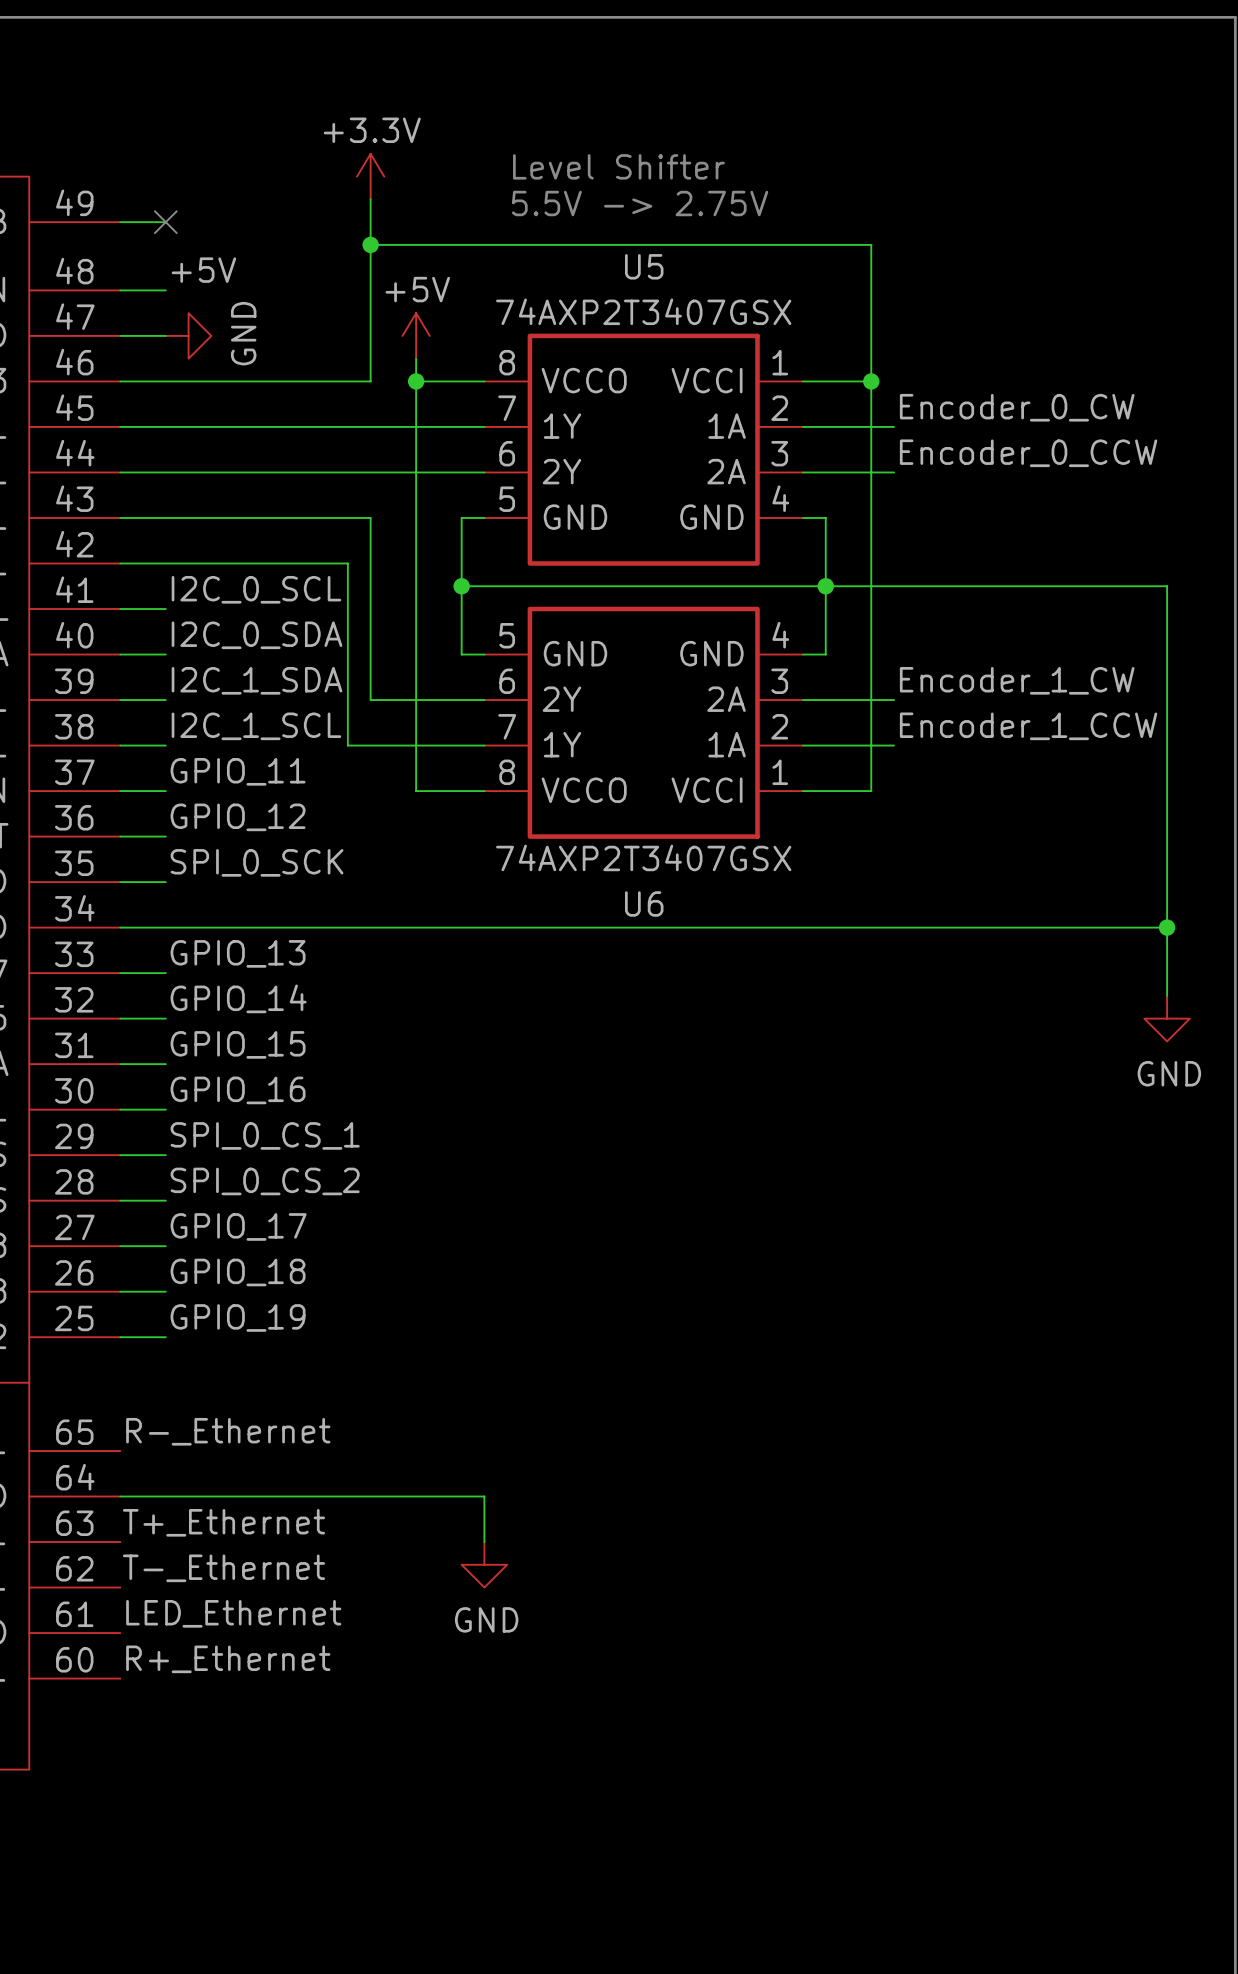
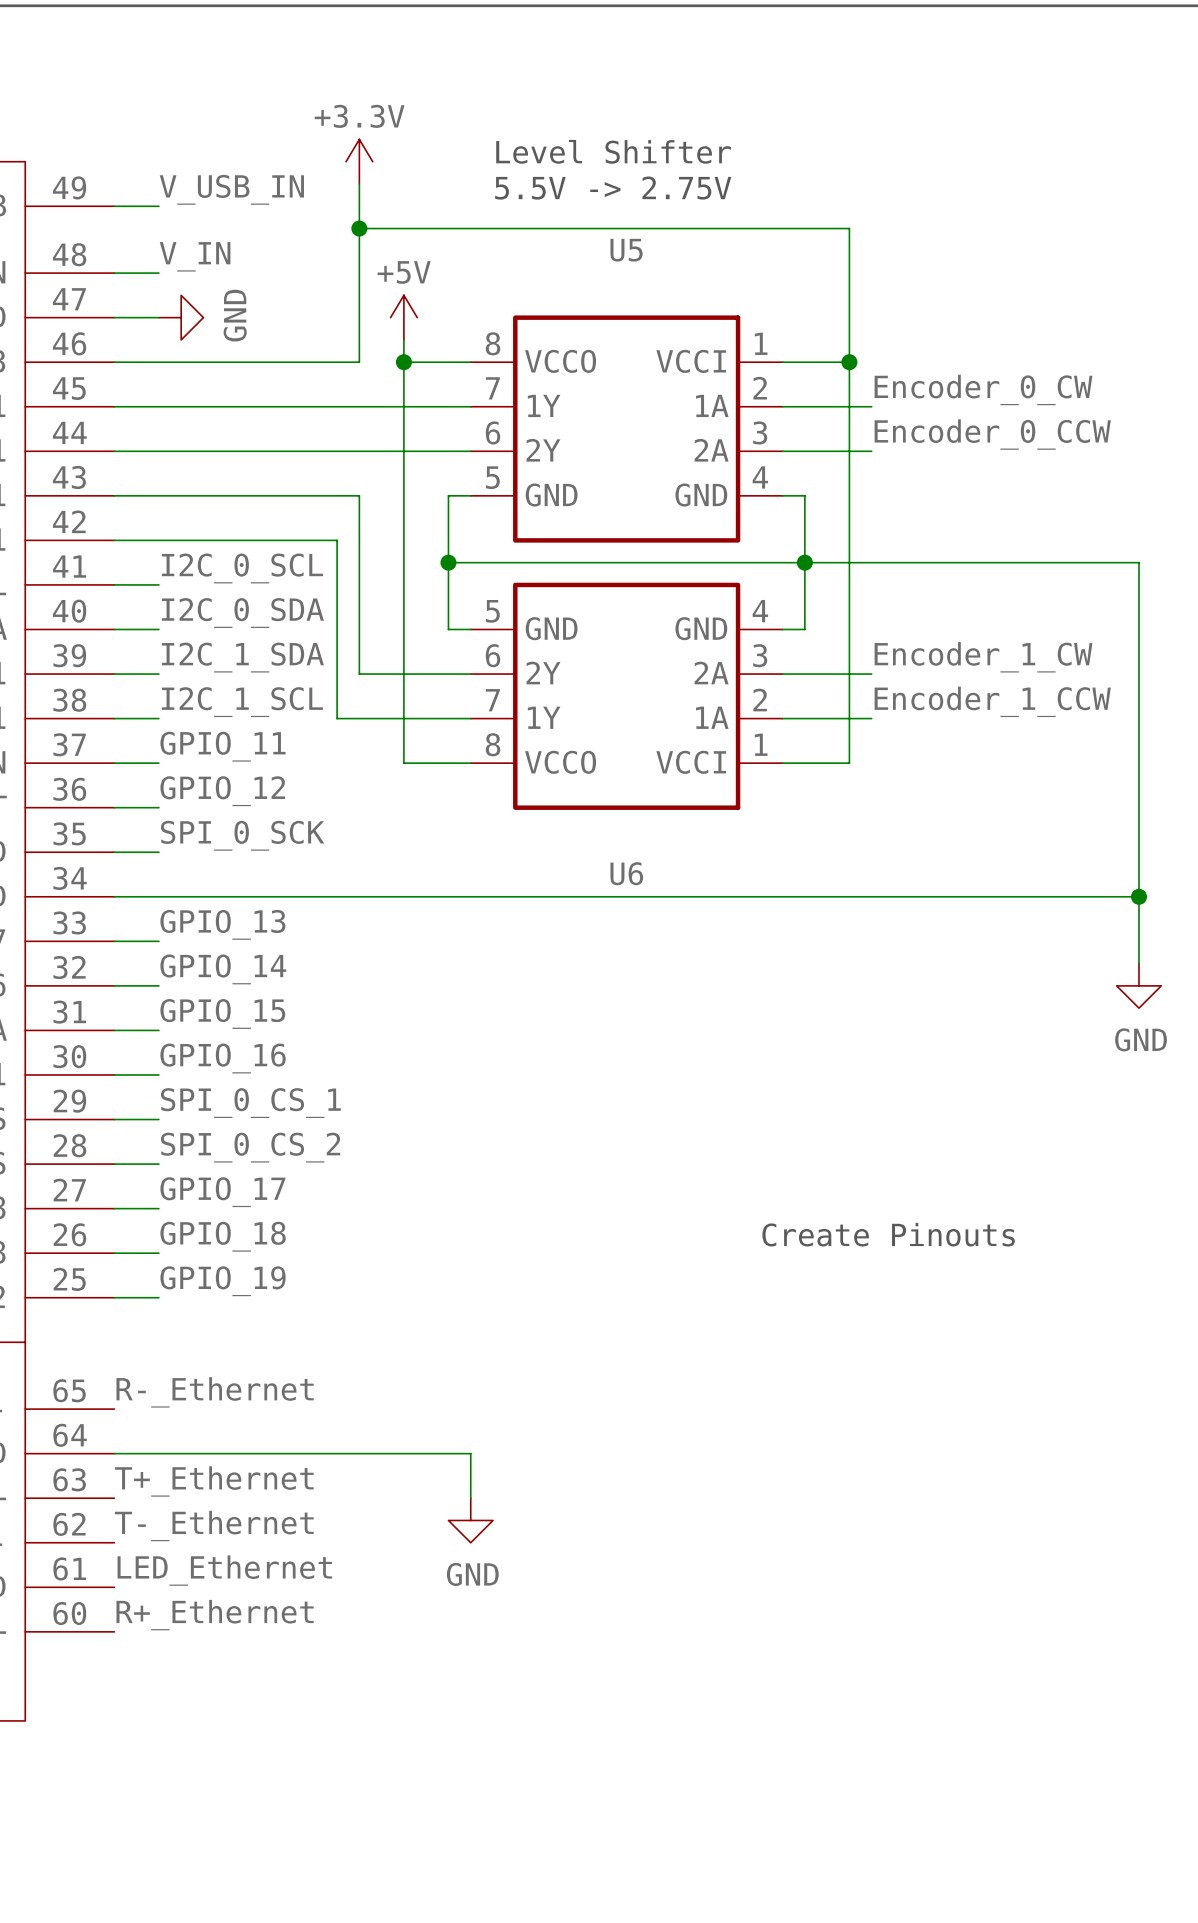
label: none -> V_USB_IN (231, 189)
no-connect mark: (165, 222) -> none
label: +5V (203, 270) -> V_IN (195, 256)
U5 value: 74AXP2T3407GSX (643, 311) -> none
U6 value: 74AXP2T3407GSX (643, 857) -> none
text: none -> Create Pinouts (888, 1234)

